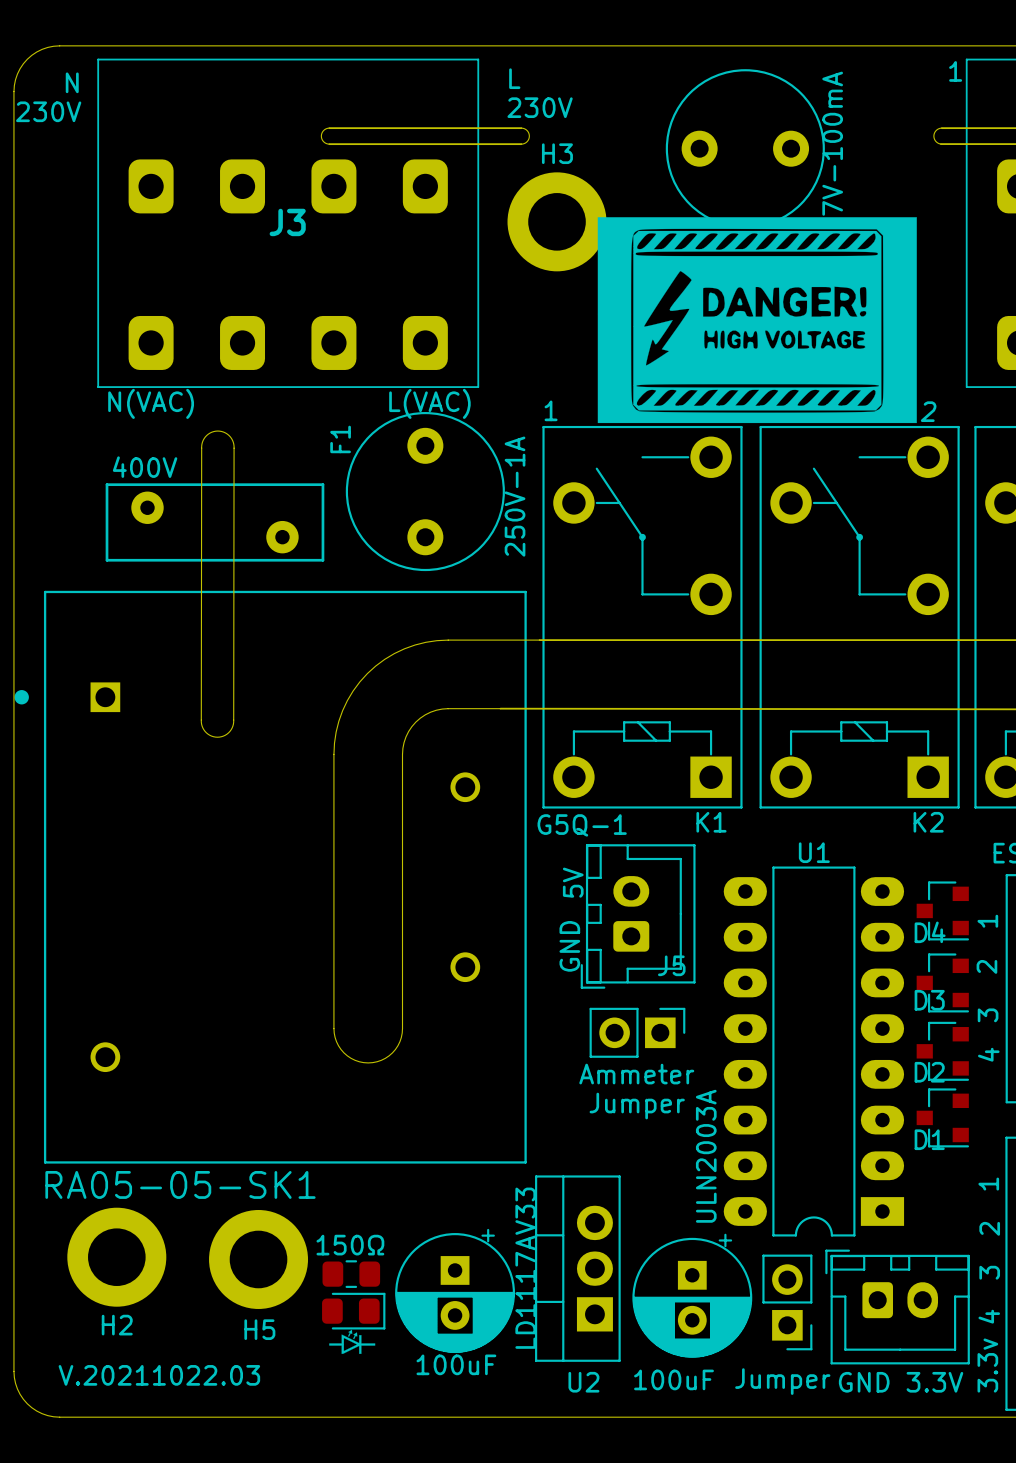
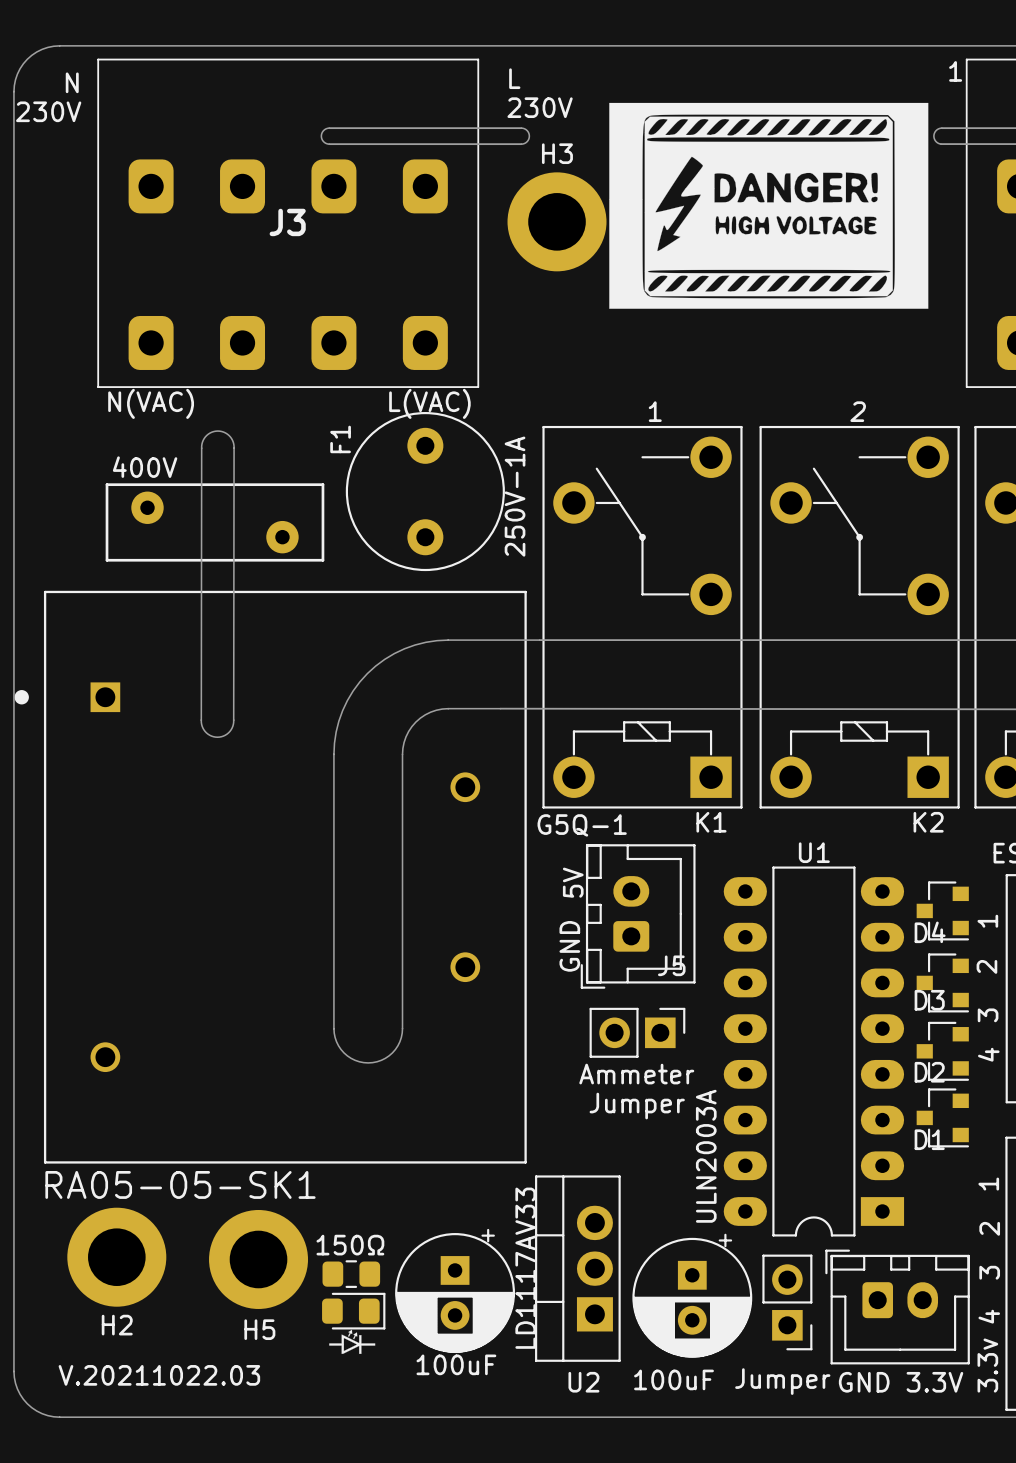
part: 7V-100mA (745, 148) -> none
drawing position: (757, 320) -> (768, 205)
text position: 1 (551, 410) -> 1 (655, 411)
text position: 2 (928, 411) -> 2 (858, 411)

